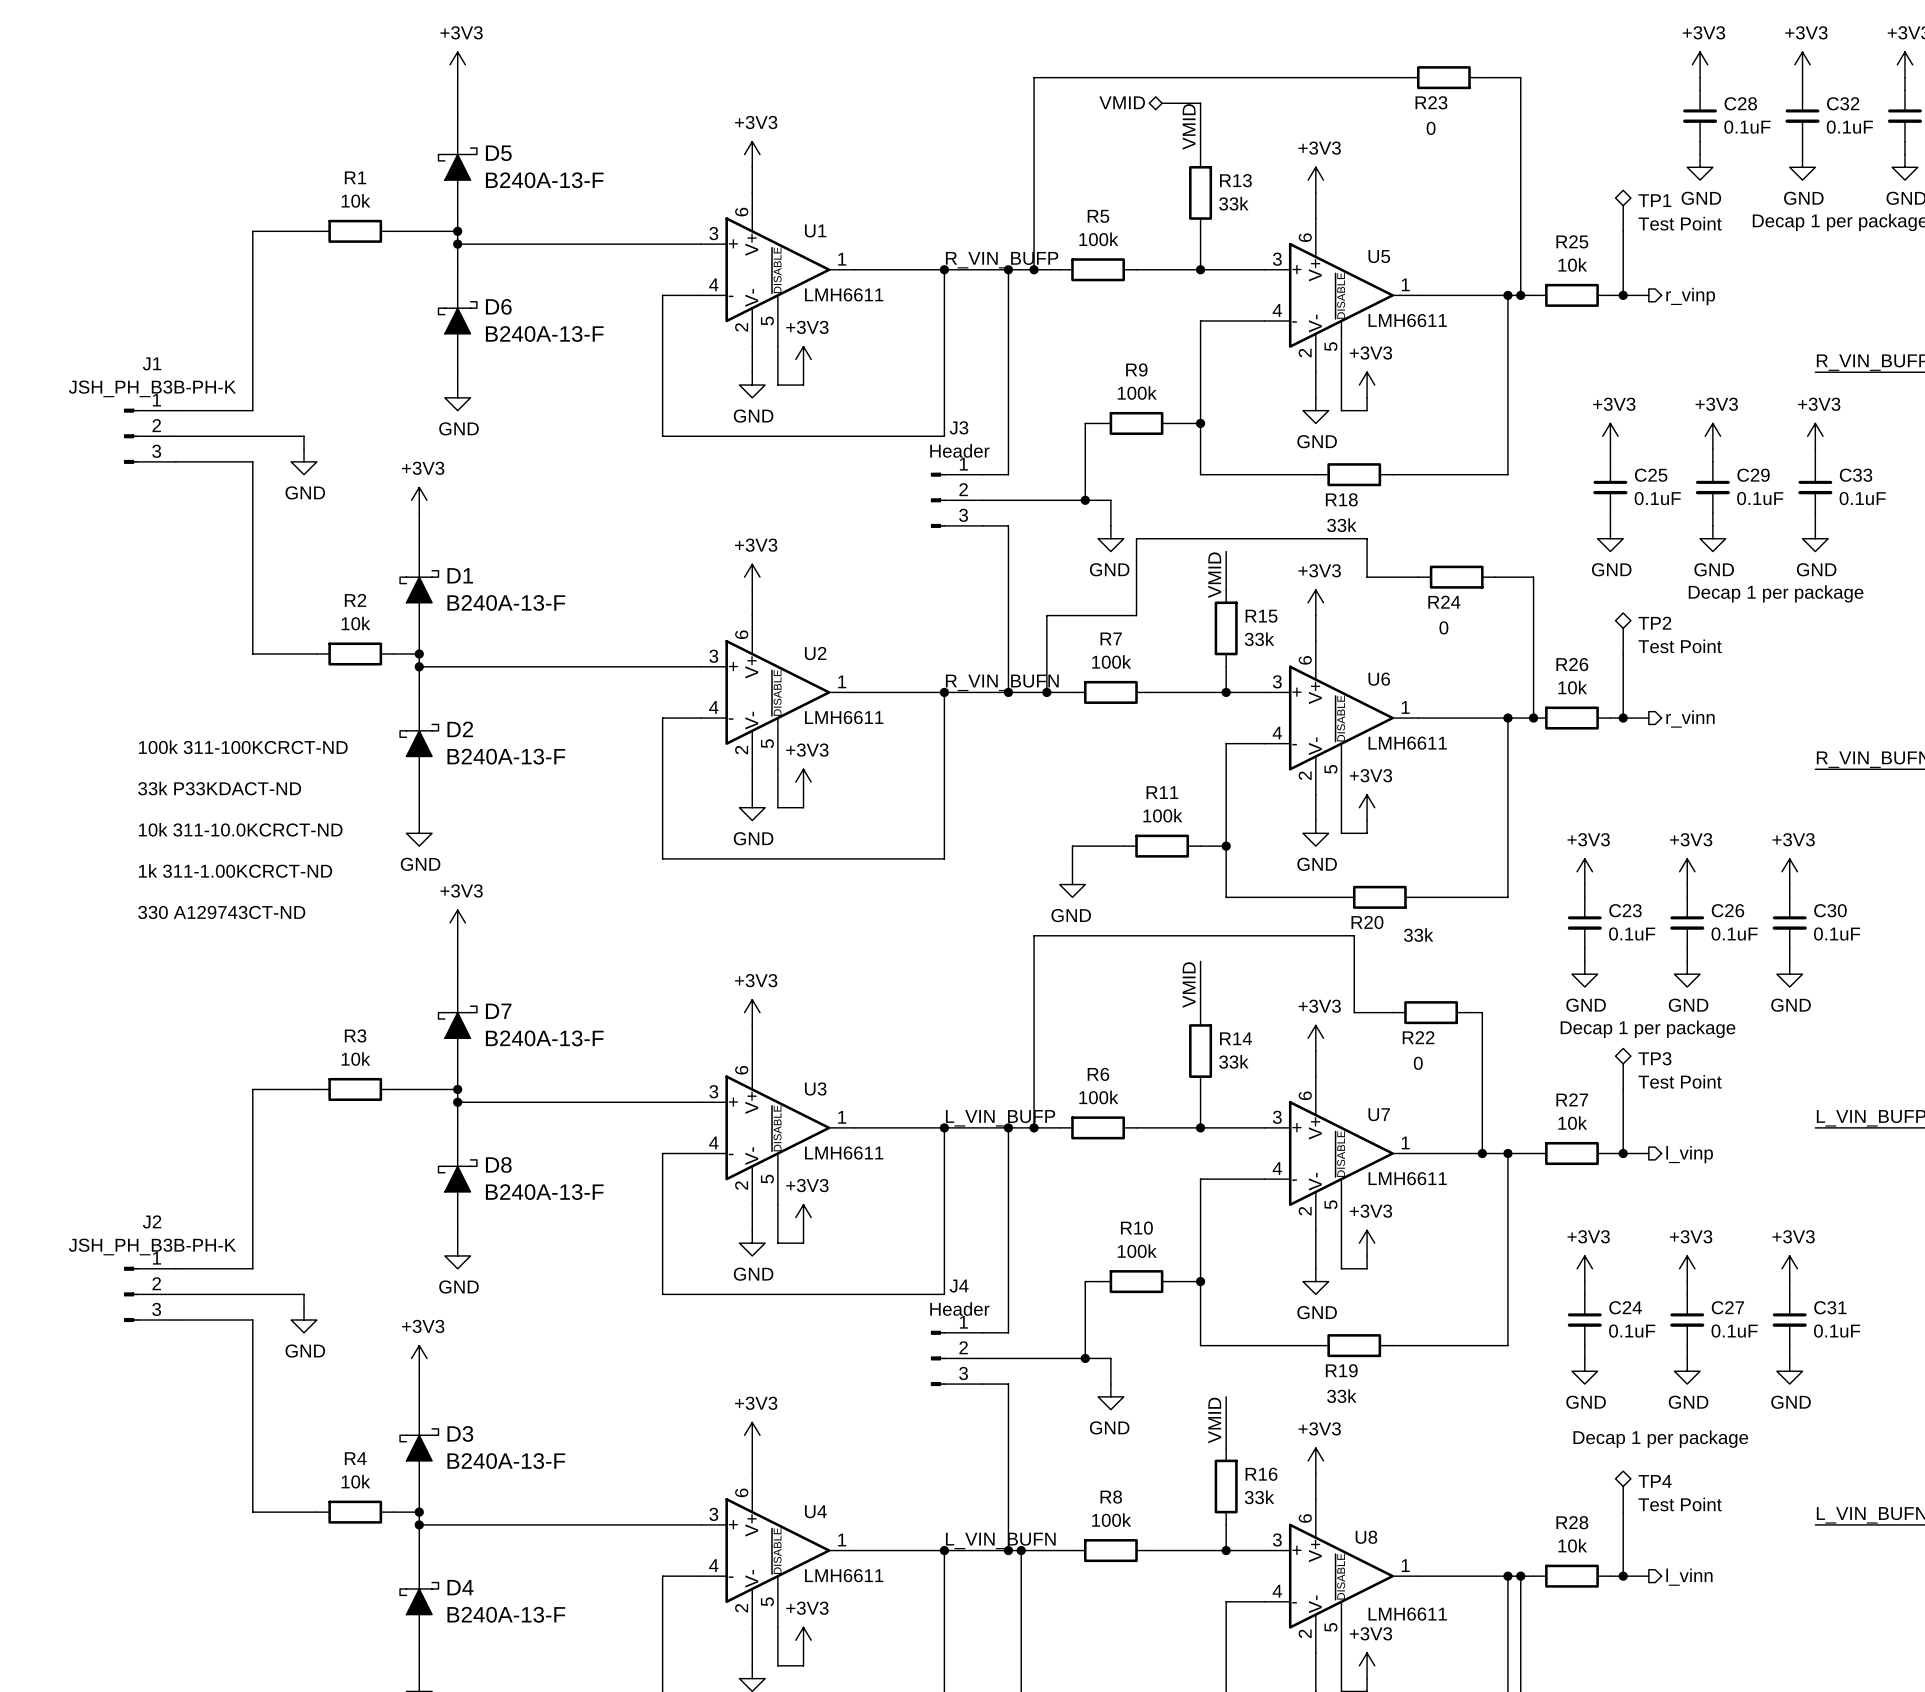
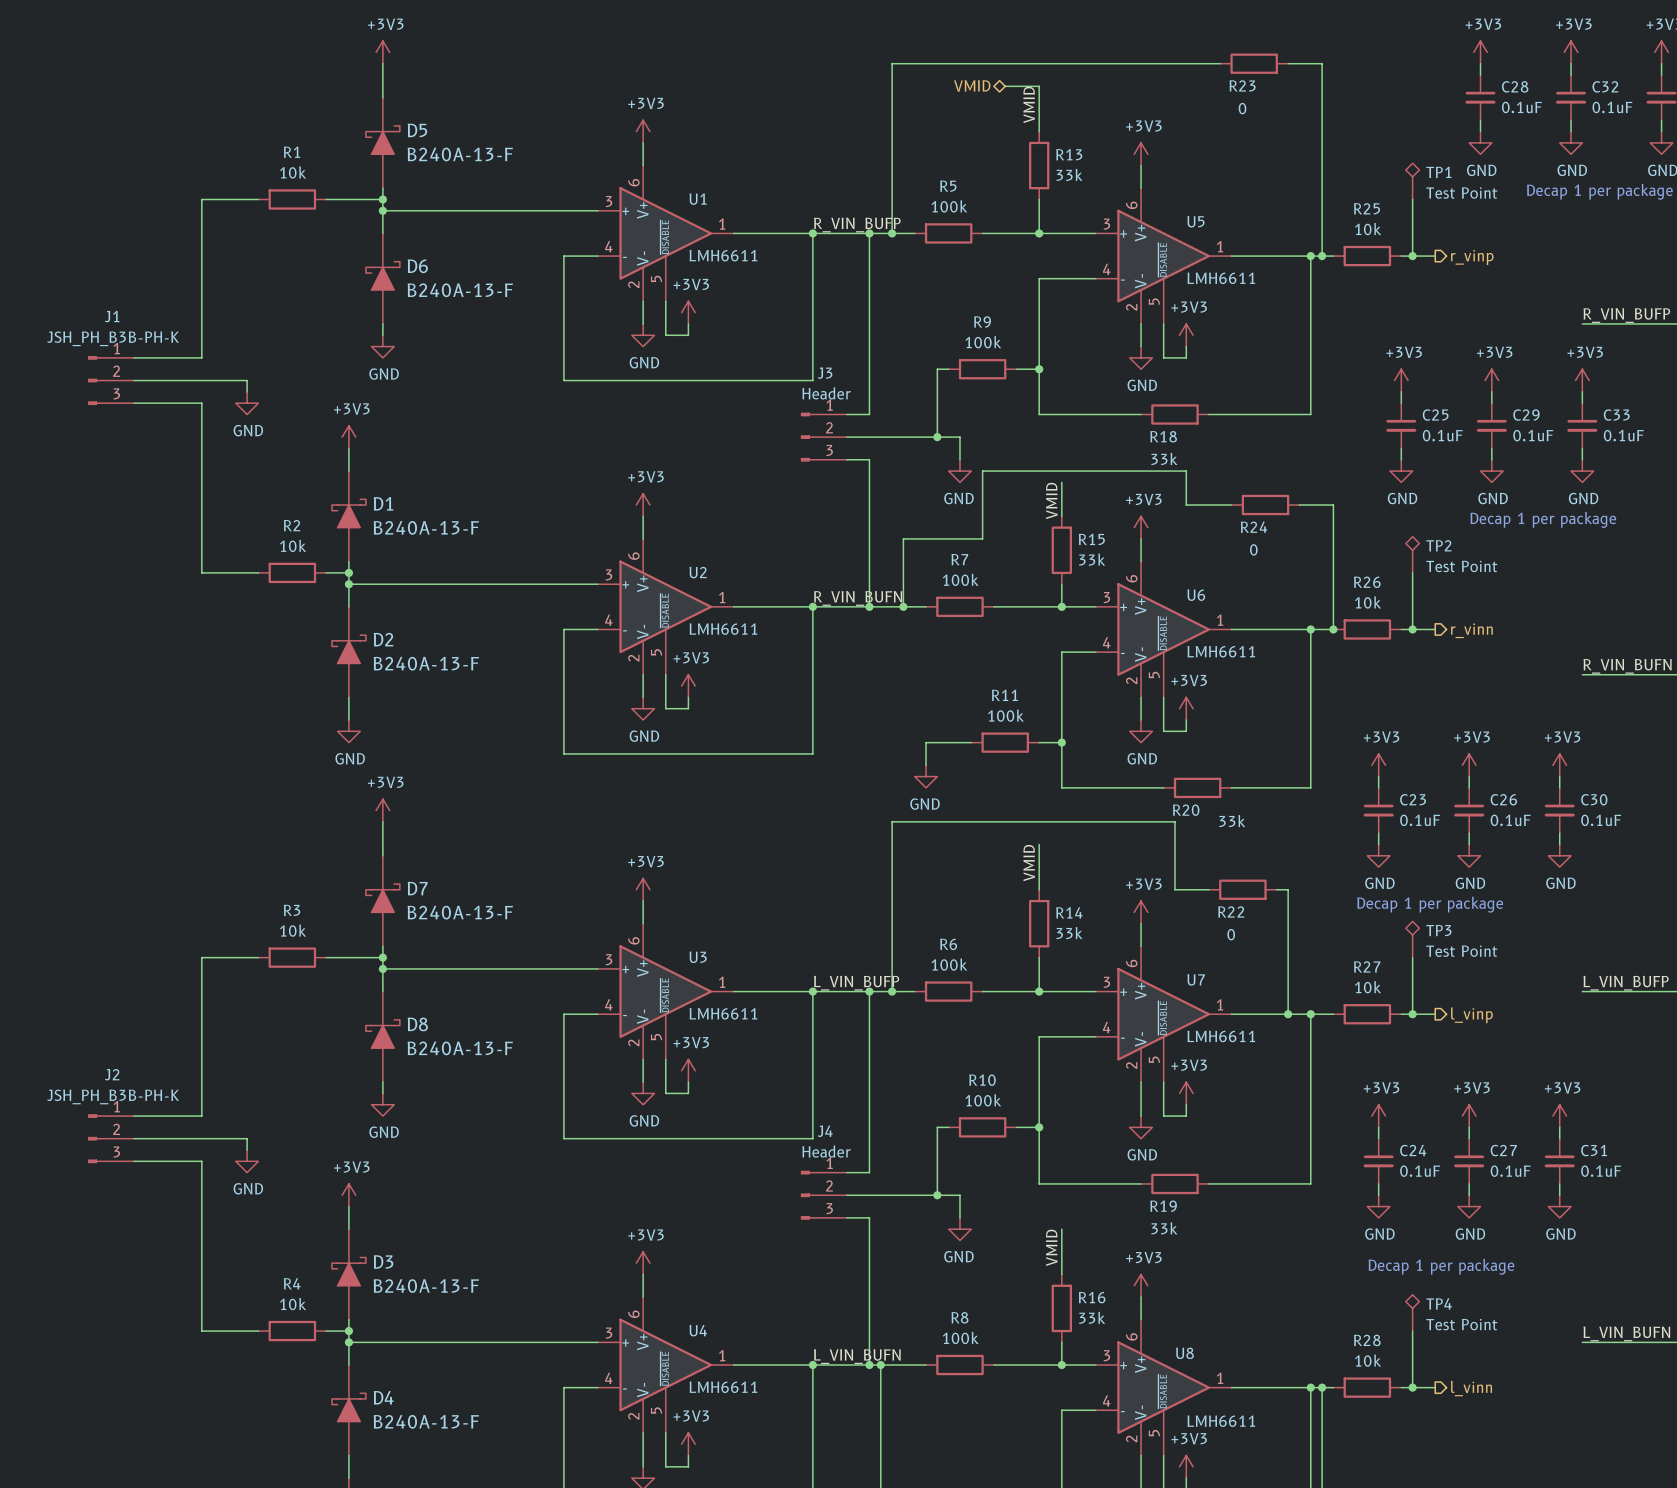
text: 100k 311-100KCRCT-ND (243, 747) -> none
text: 33k P33KDACT-ND (219, 788) -> none
text: 10k 311-10.0KCRCT-ND (240, 829) -> none
text: 1k 311-1.00KCRCT-ND (235, 870) -> none
text: 330 A129743CT-ND (221, 912) -> none

